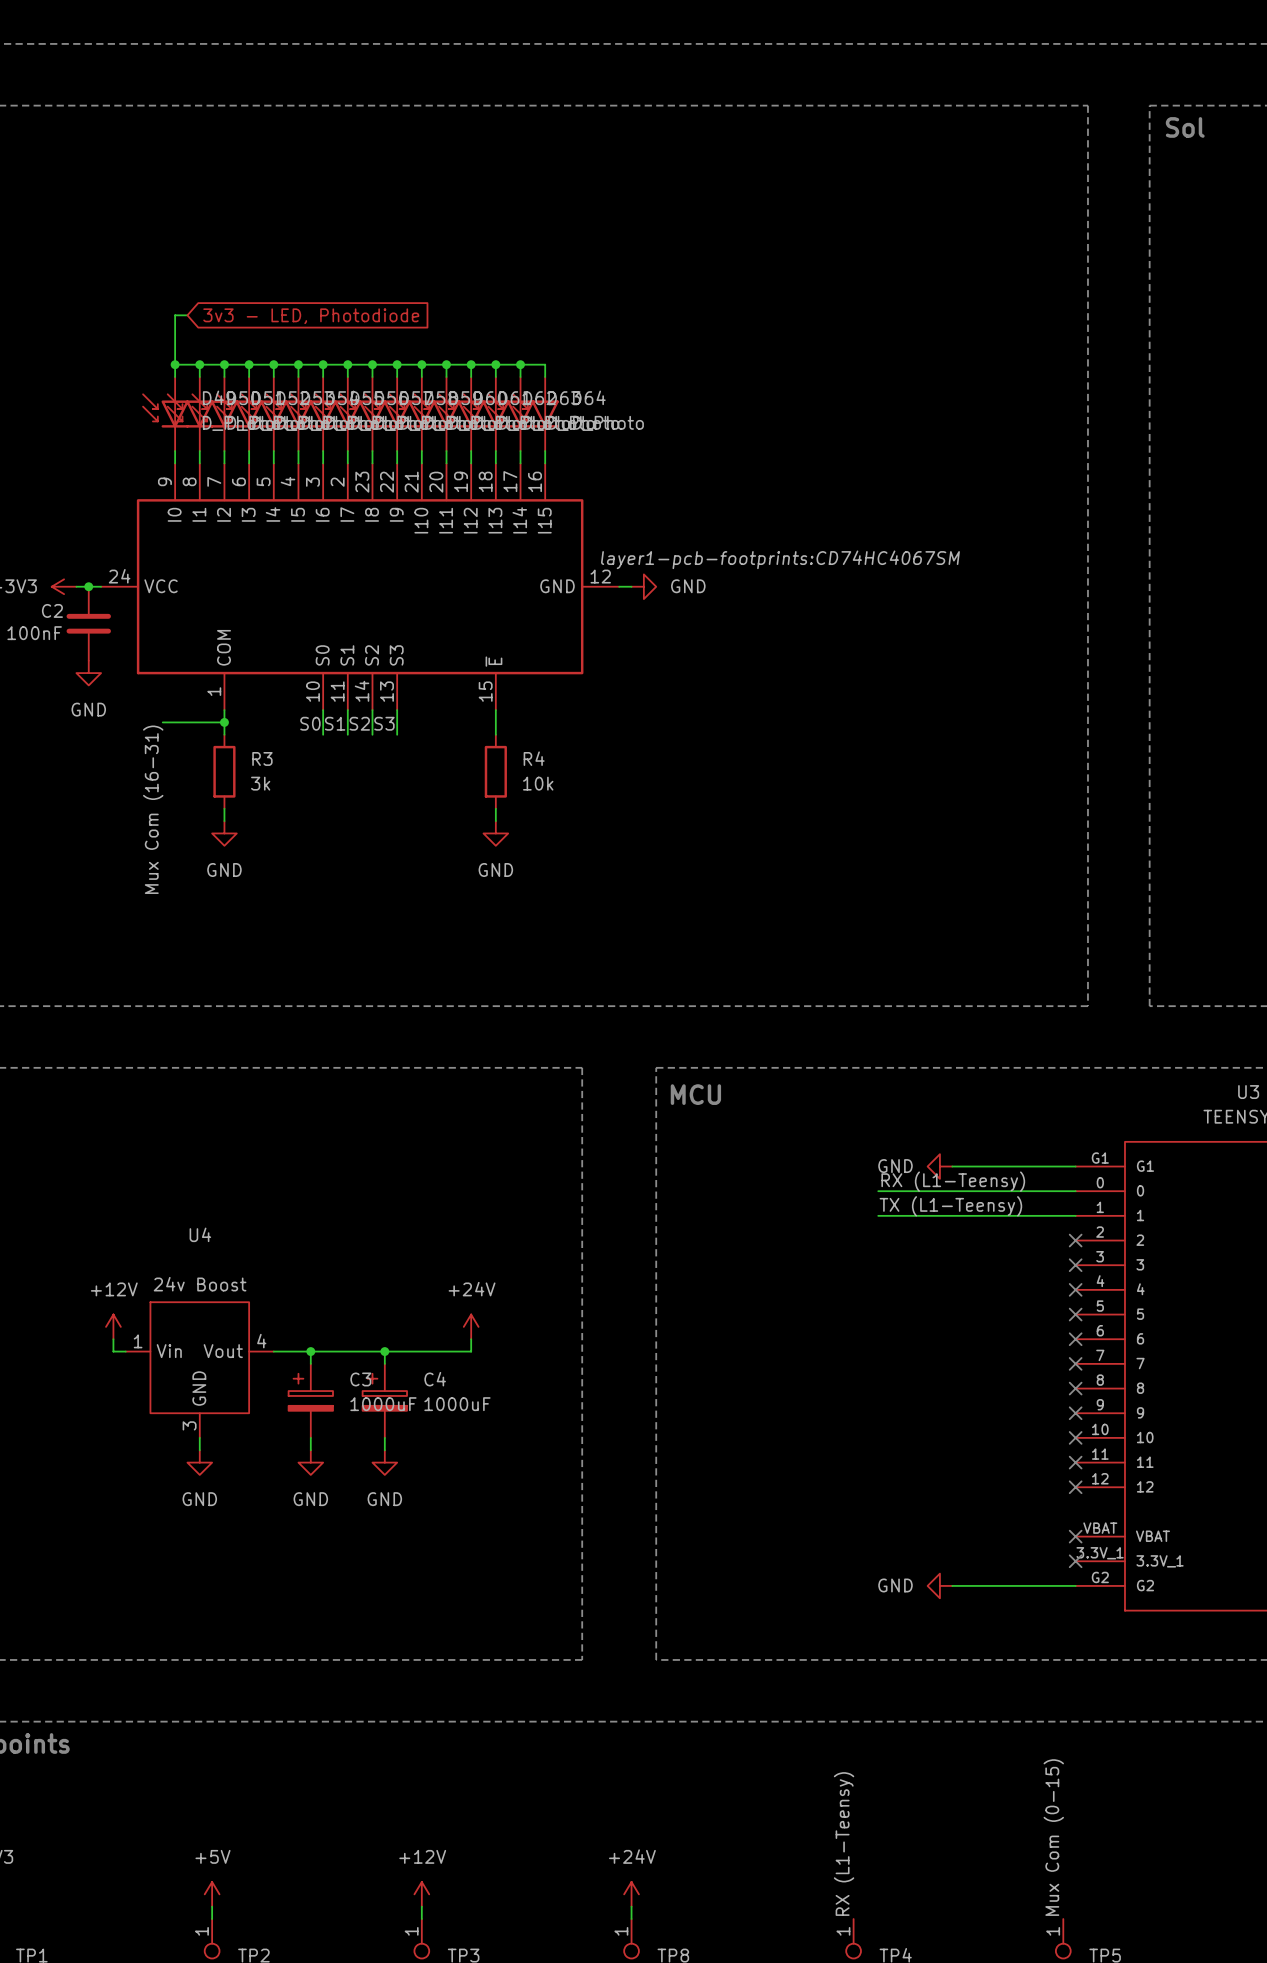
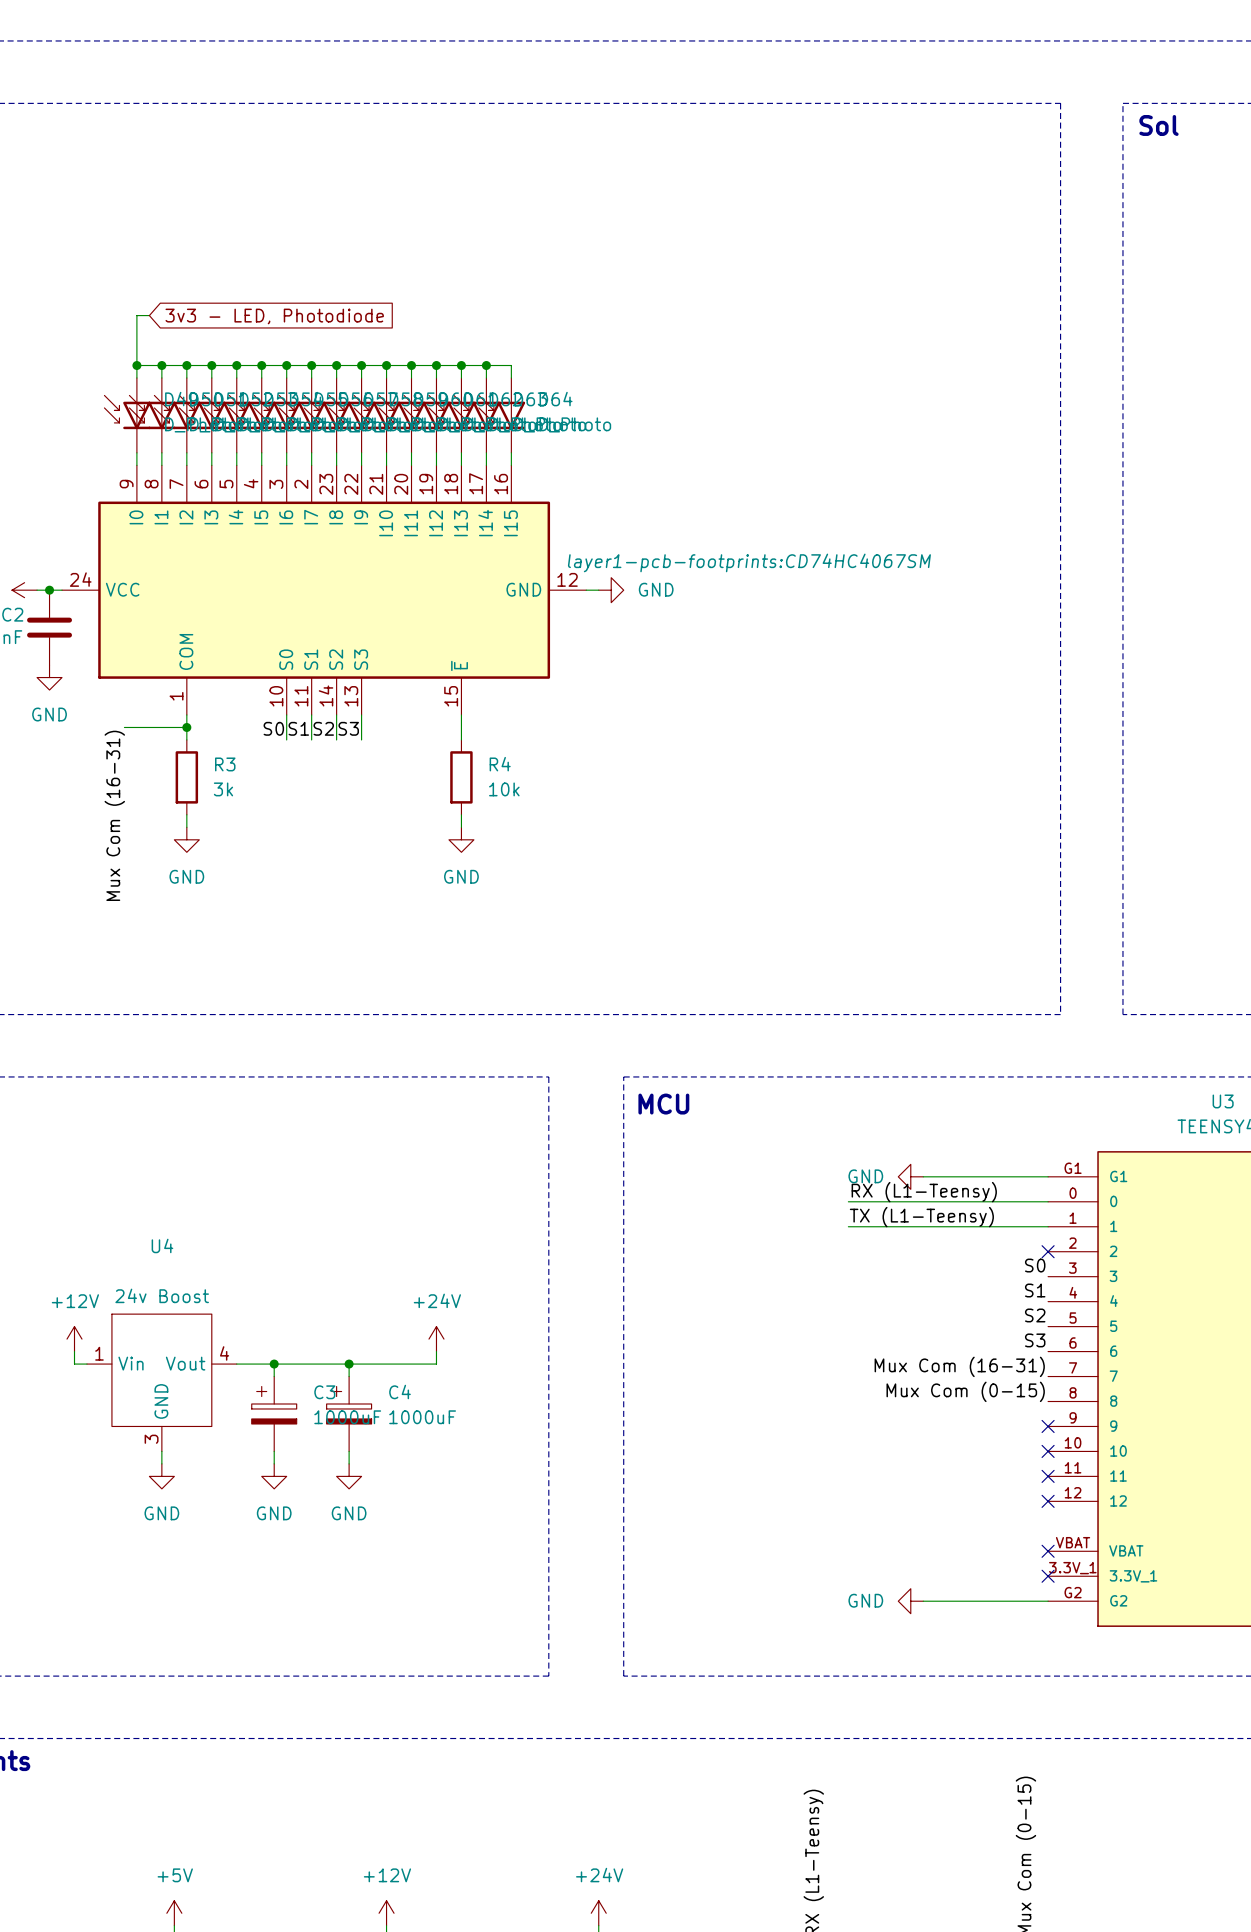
label: none -> S0 (1035, 1265)
no-connect mark: (1075, 1265) -> none
label: none -> S1 (1035, 1290)
no-connect mark: (1075, 1289) -> none
label: none -> S2 (1035, 1315)
no-connect mark: (1075, 1314) -> none
label: none -> S3 (1035, 1340)
no-connect mark: (1075, 1339) -> none
label: none -> Mux Com (16-31) (959, 1366)
no-connect mark: (1075, 1363) -> none
label: none -> Mux Com (0-15) (965, 1391)
no-connect mark: (1075, 1388) -> none

